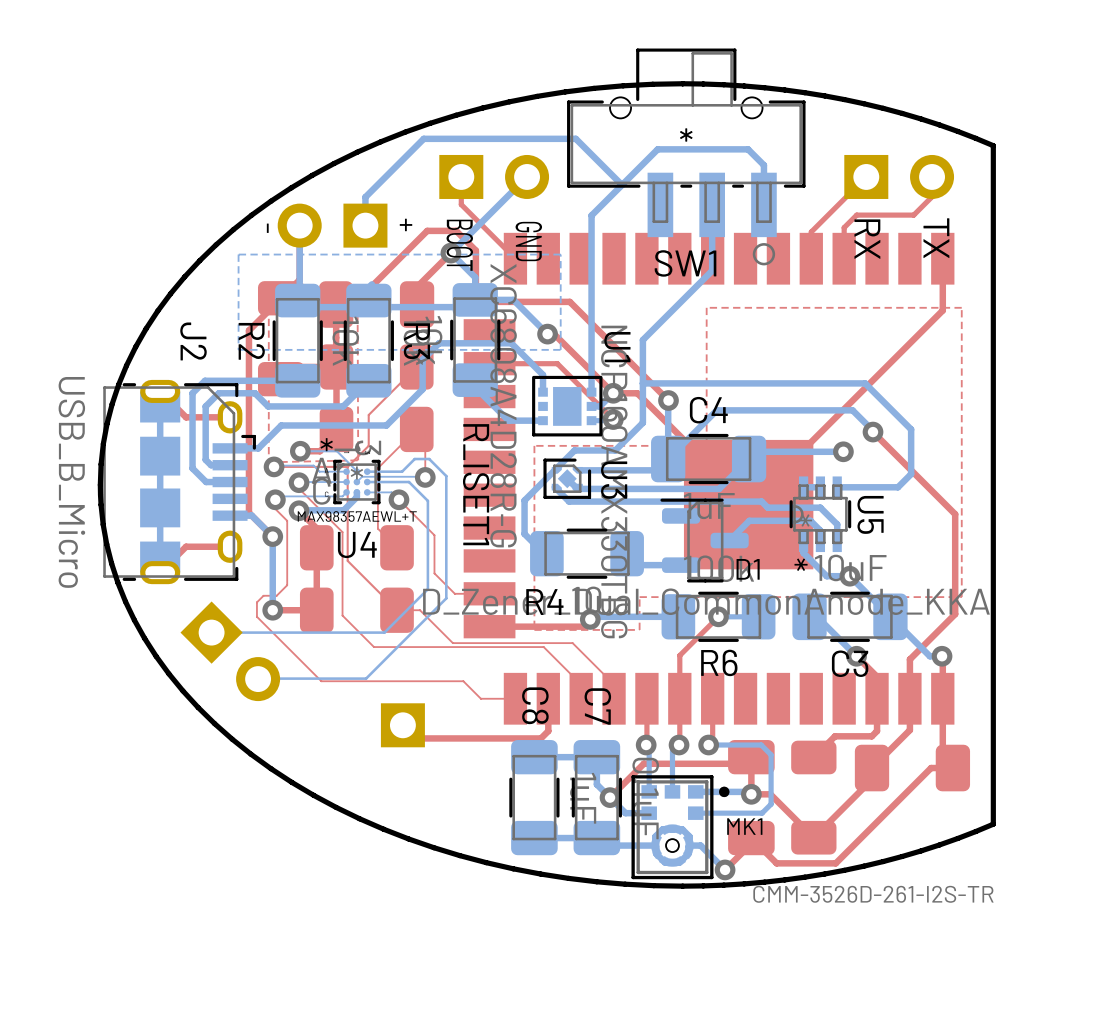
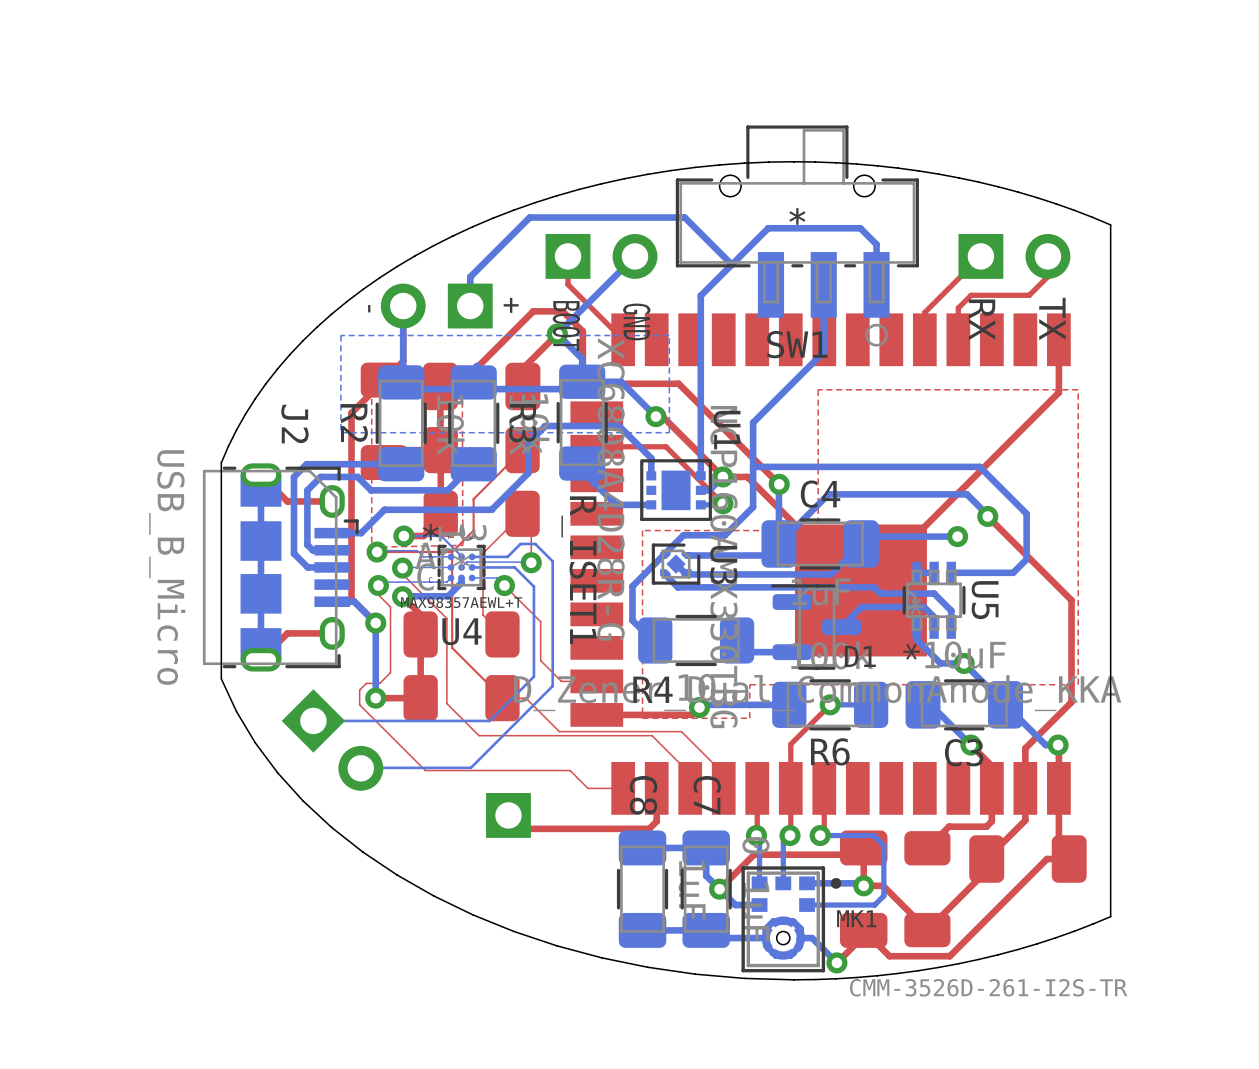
board edge: (682, 83) (764, 87) (844, 99) (921, 118) (993, 145) (993, 824) (939, 844) (863, 866) (784, 879) (723, 885) (653, 885) (568, 878) (513, 868) (433, 847) (383, 829) (336, 807) (270, 768) (214, 723) (182, 690) (156, 656) (134, 620) (117, 582) (103, 524) (100, 494) (101, 464) (112, 404) (135, 347) (157, 311) (184, 276) (233, 229) (270, 201) (312, 175) (357, 152) (405, 132) (482, 108) (537, 96) (594, 88) (682, 83) -> (793, 161) (877, 165) (958, 177) (1036, 197) (1110, 224) (1110, 916) (1055, 937) (978, 959) (898, 973) (835, 978) (744, 978) (695, 974) (647, 967) (556, 945) (472, 914) (397, 875) (363, 852) (331, 827) (302, 800) (277, 772) (255, 742) (236, 711) (221, 678) (221, 462) (236, 430) (255, 398) (277, 369) (302, 340) (331, 314) (363, 289) (397, 266) (433, 245) (513, 210) (601, 183) (695, 167) (793, 161)

